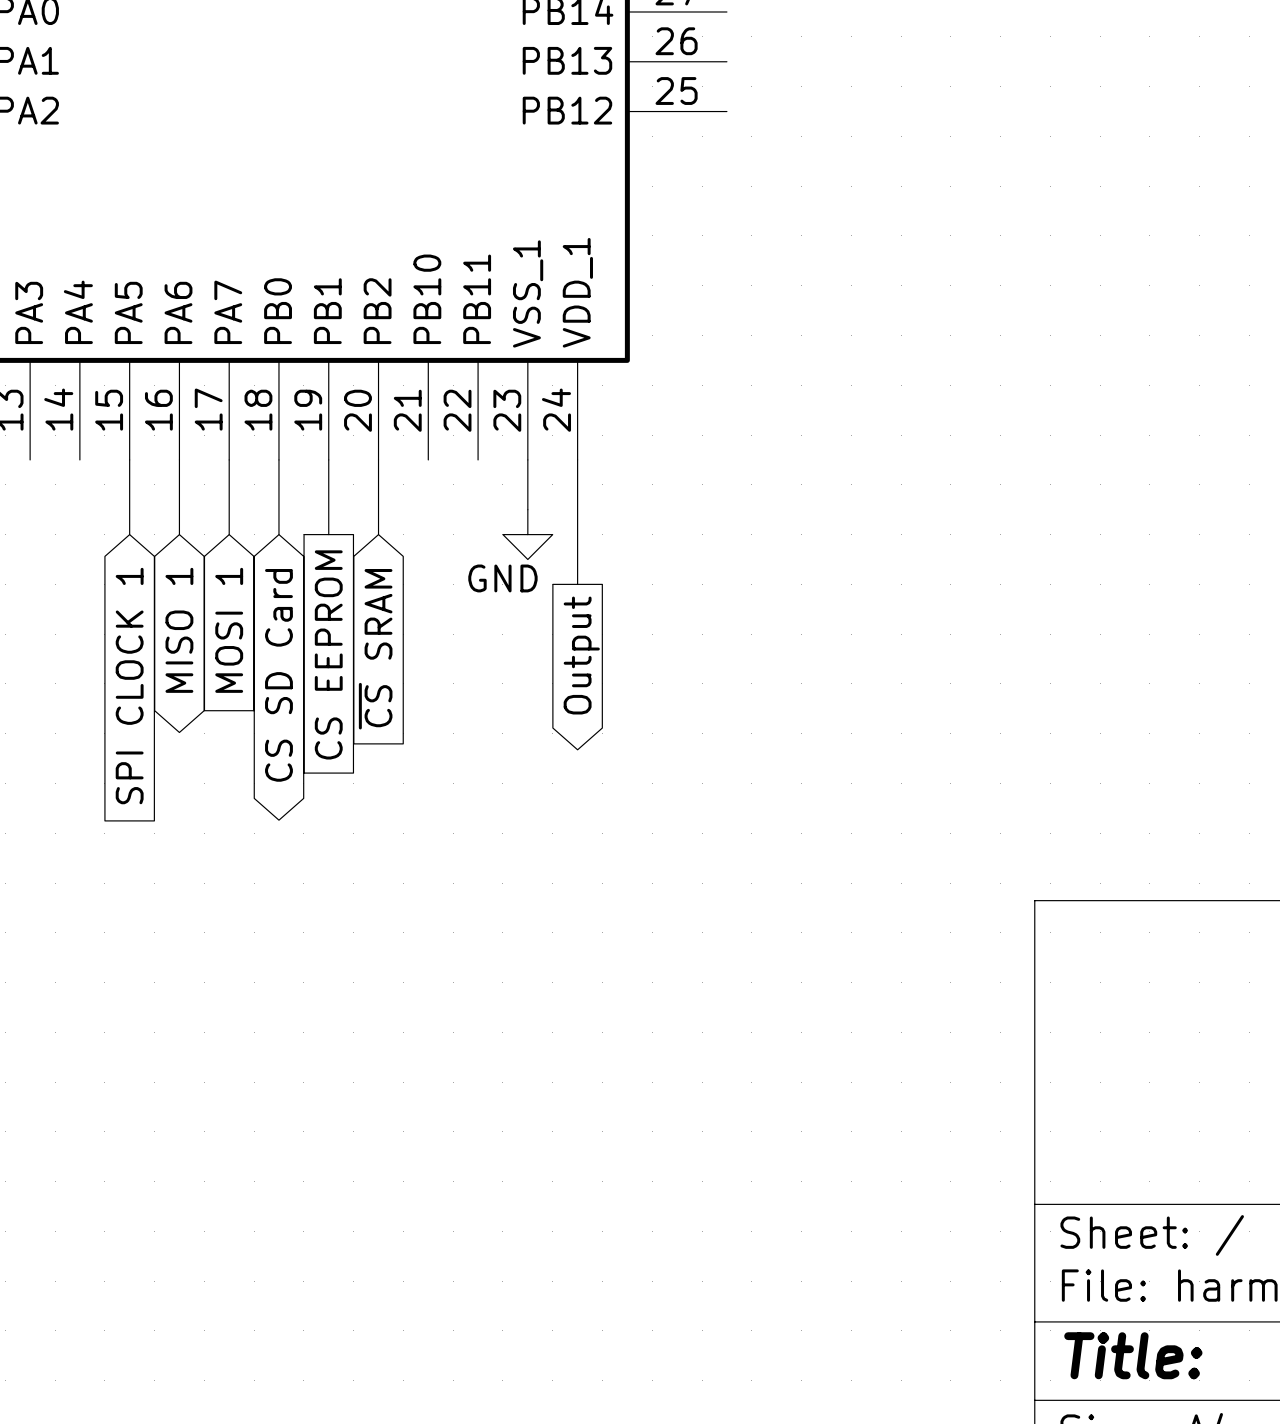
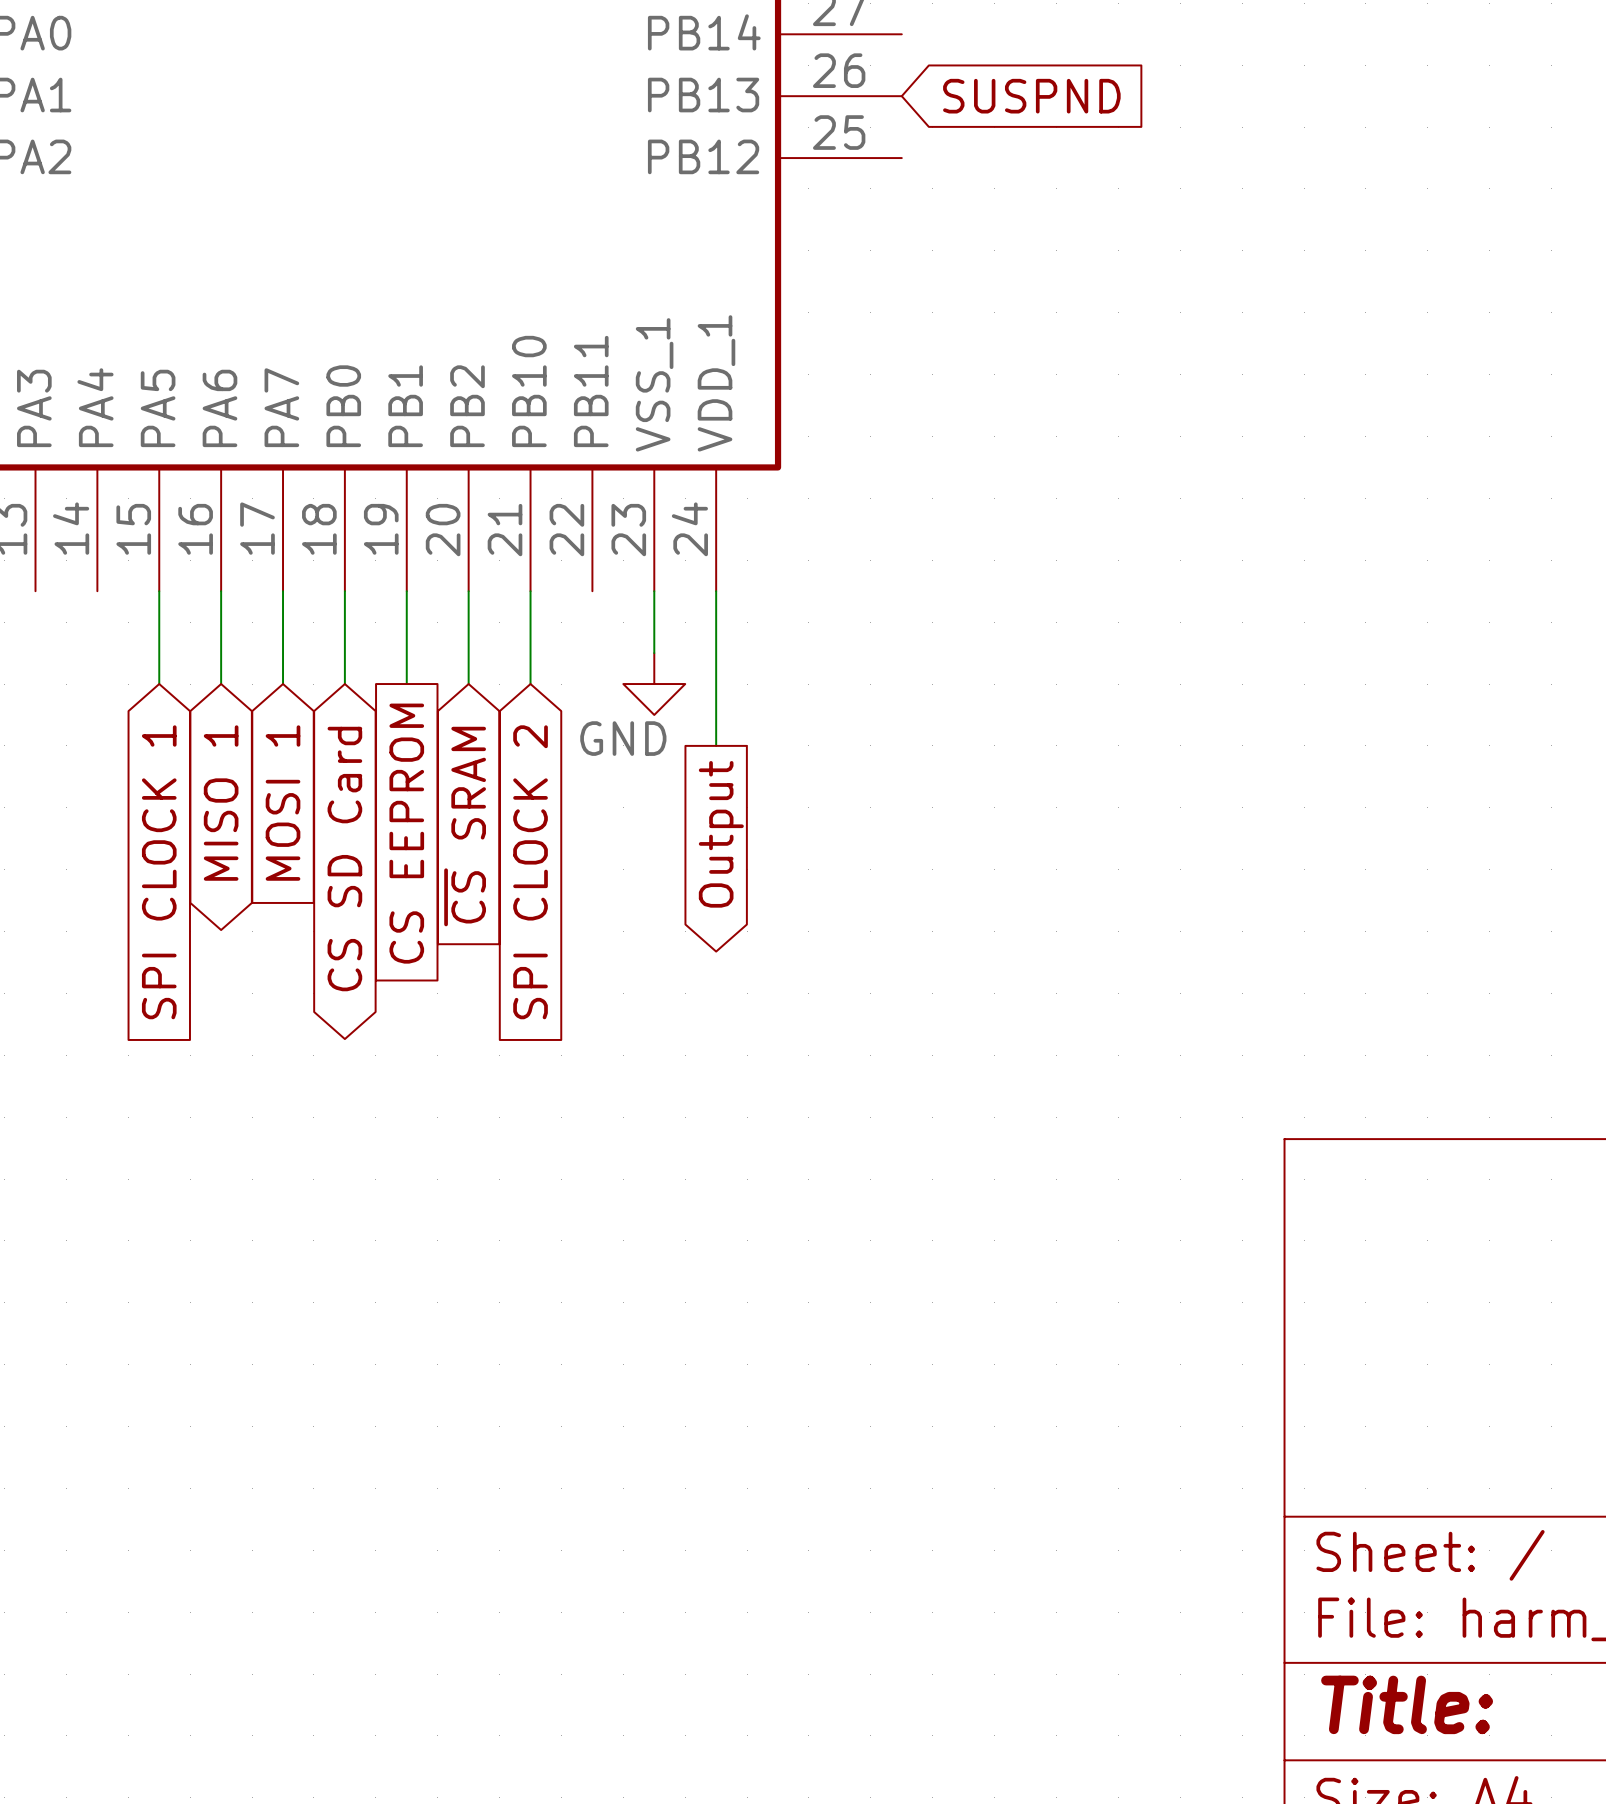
global label: none -> SUSPND (1031, 96)
wire: none -> (530, 591) (530, 684)
global label: none -> SPI CLOCK 2 (530, 872)

